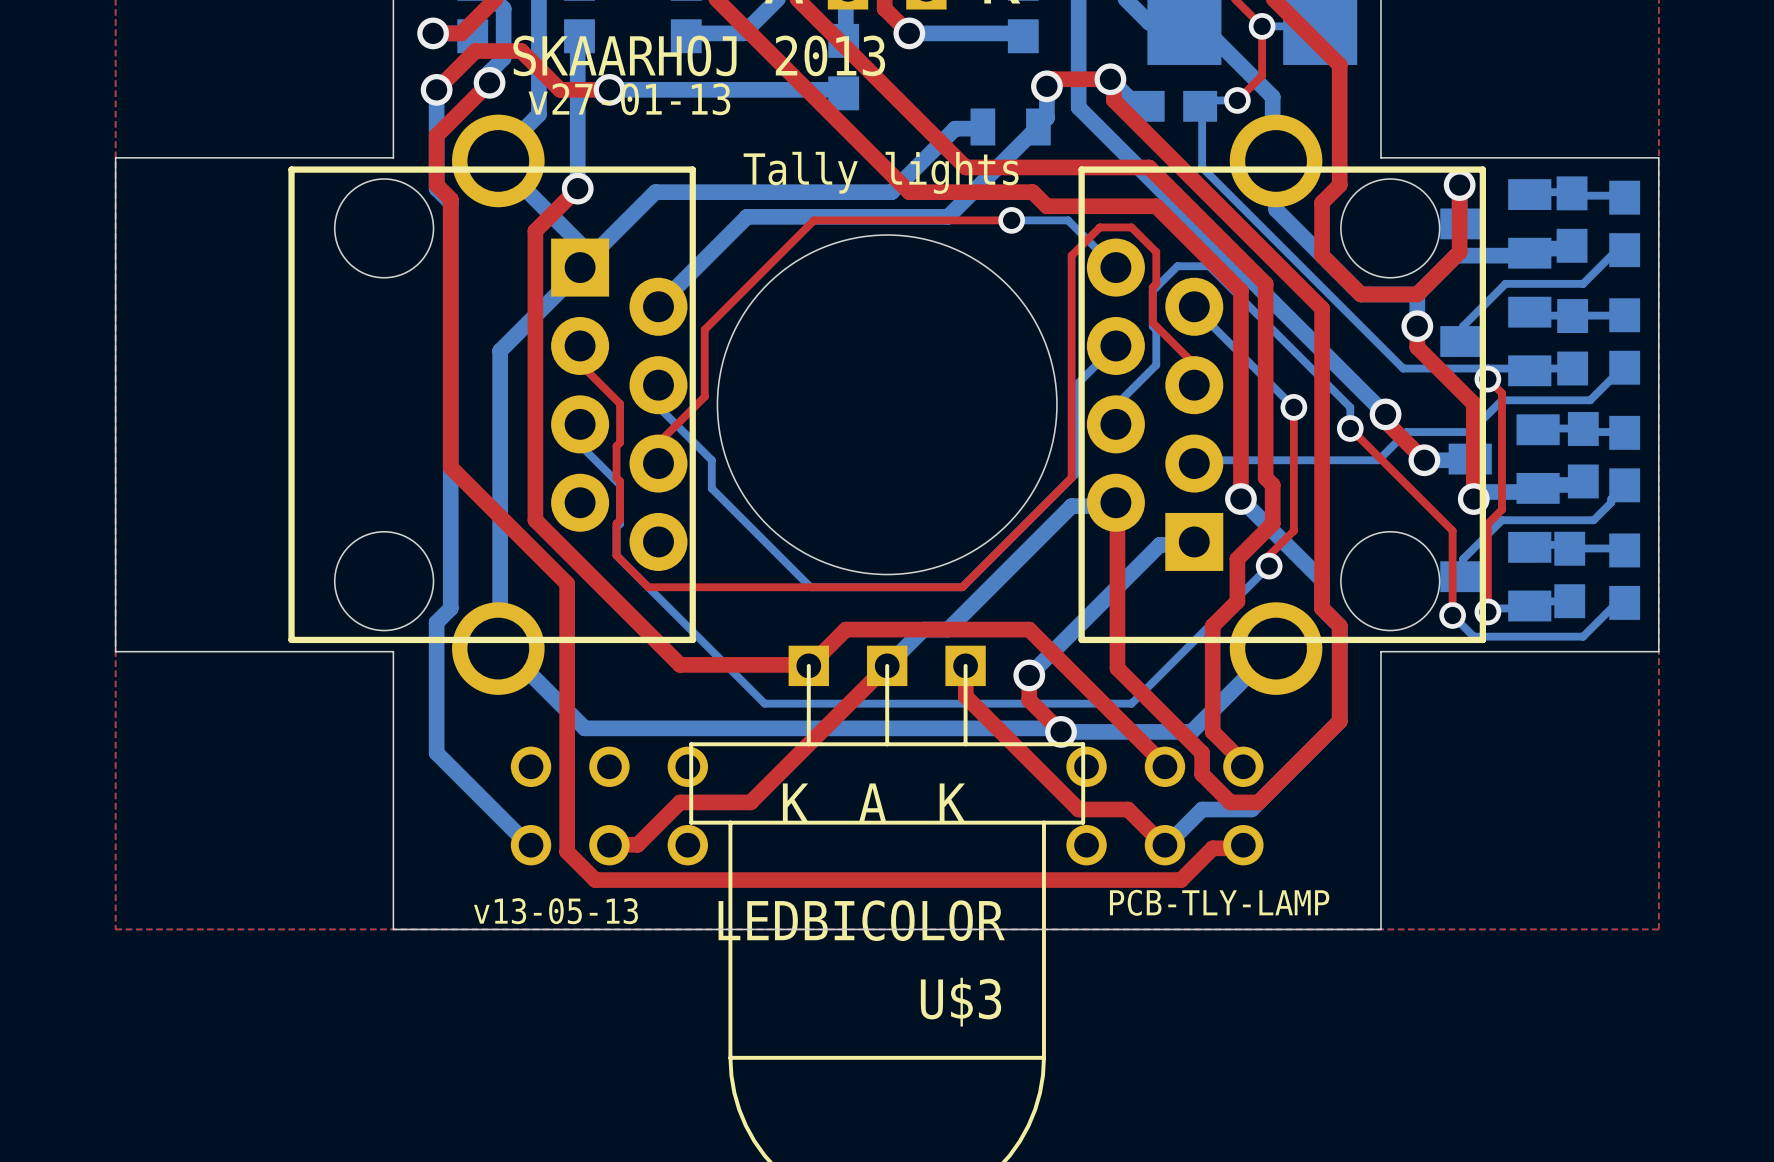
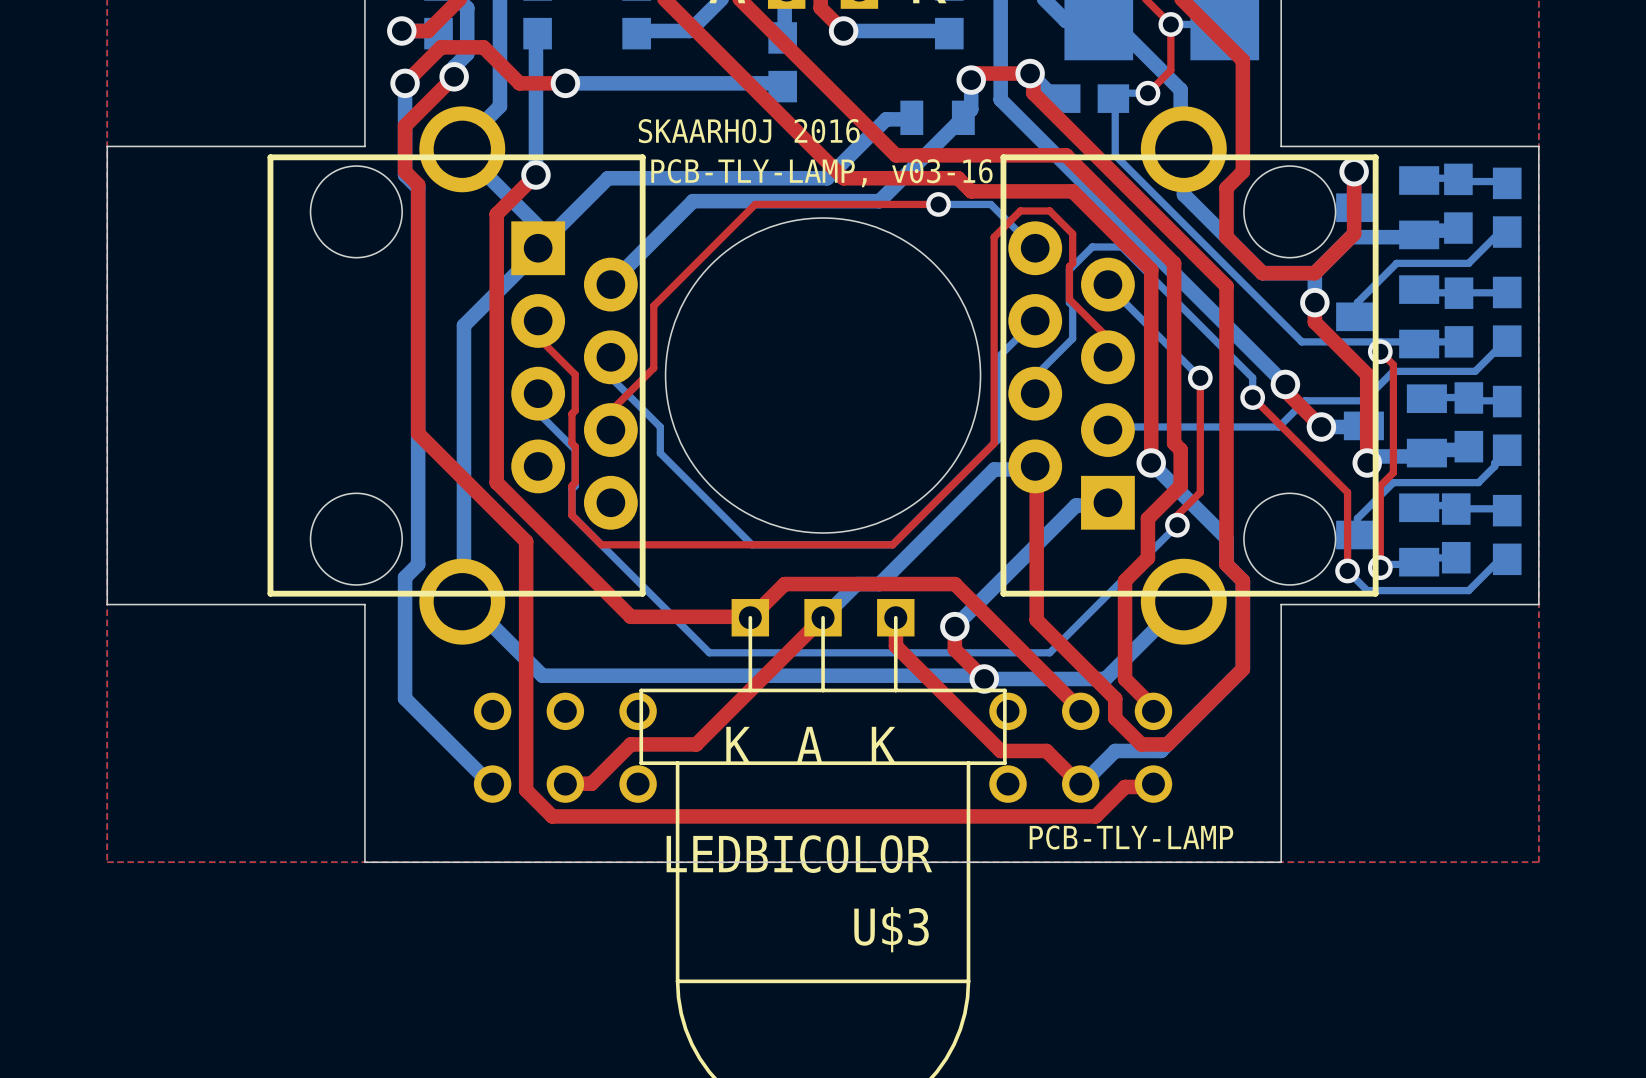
text: SKAARHOJ 2013 (699, 55) -> none
text: v27-01-13 (629, 99) -> none
text: none -> SKAARHOJ 2016 (749, 131)
text: Tally lights (881, 172) -> none
text: none -> PCB-TLY-LAMP, v03-16 (821, 173)
text: v13-05-13 (555, 911) -> none

